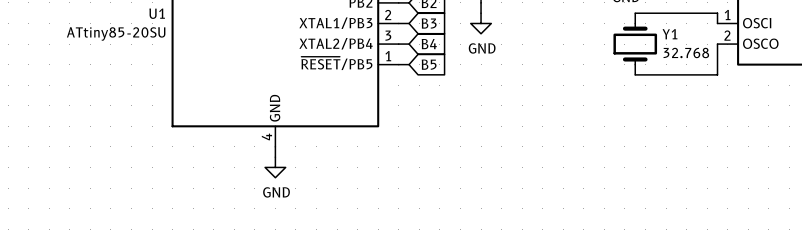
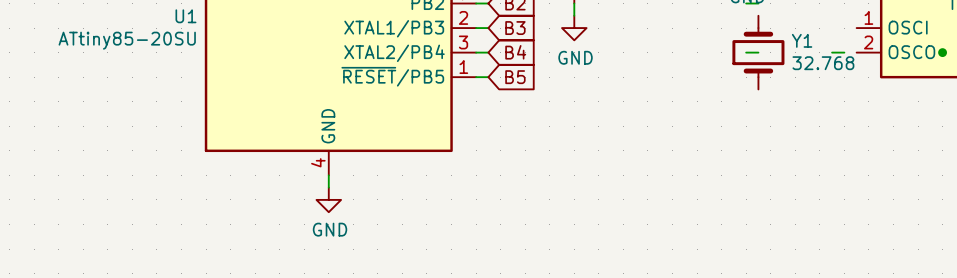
wire: none -> (746, 3) (758, 3)
wire: (635, 13) (717, 13) (717, 23) -> none
wire: none -> (746, 52) (758, 52)
wire: none -> (832, 52) (844, 52)
wire: (717, 44) (717, 74) (635, 74) -> none
junction: none -> (942, 52)

